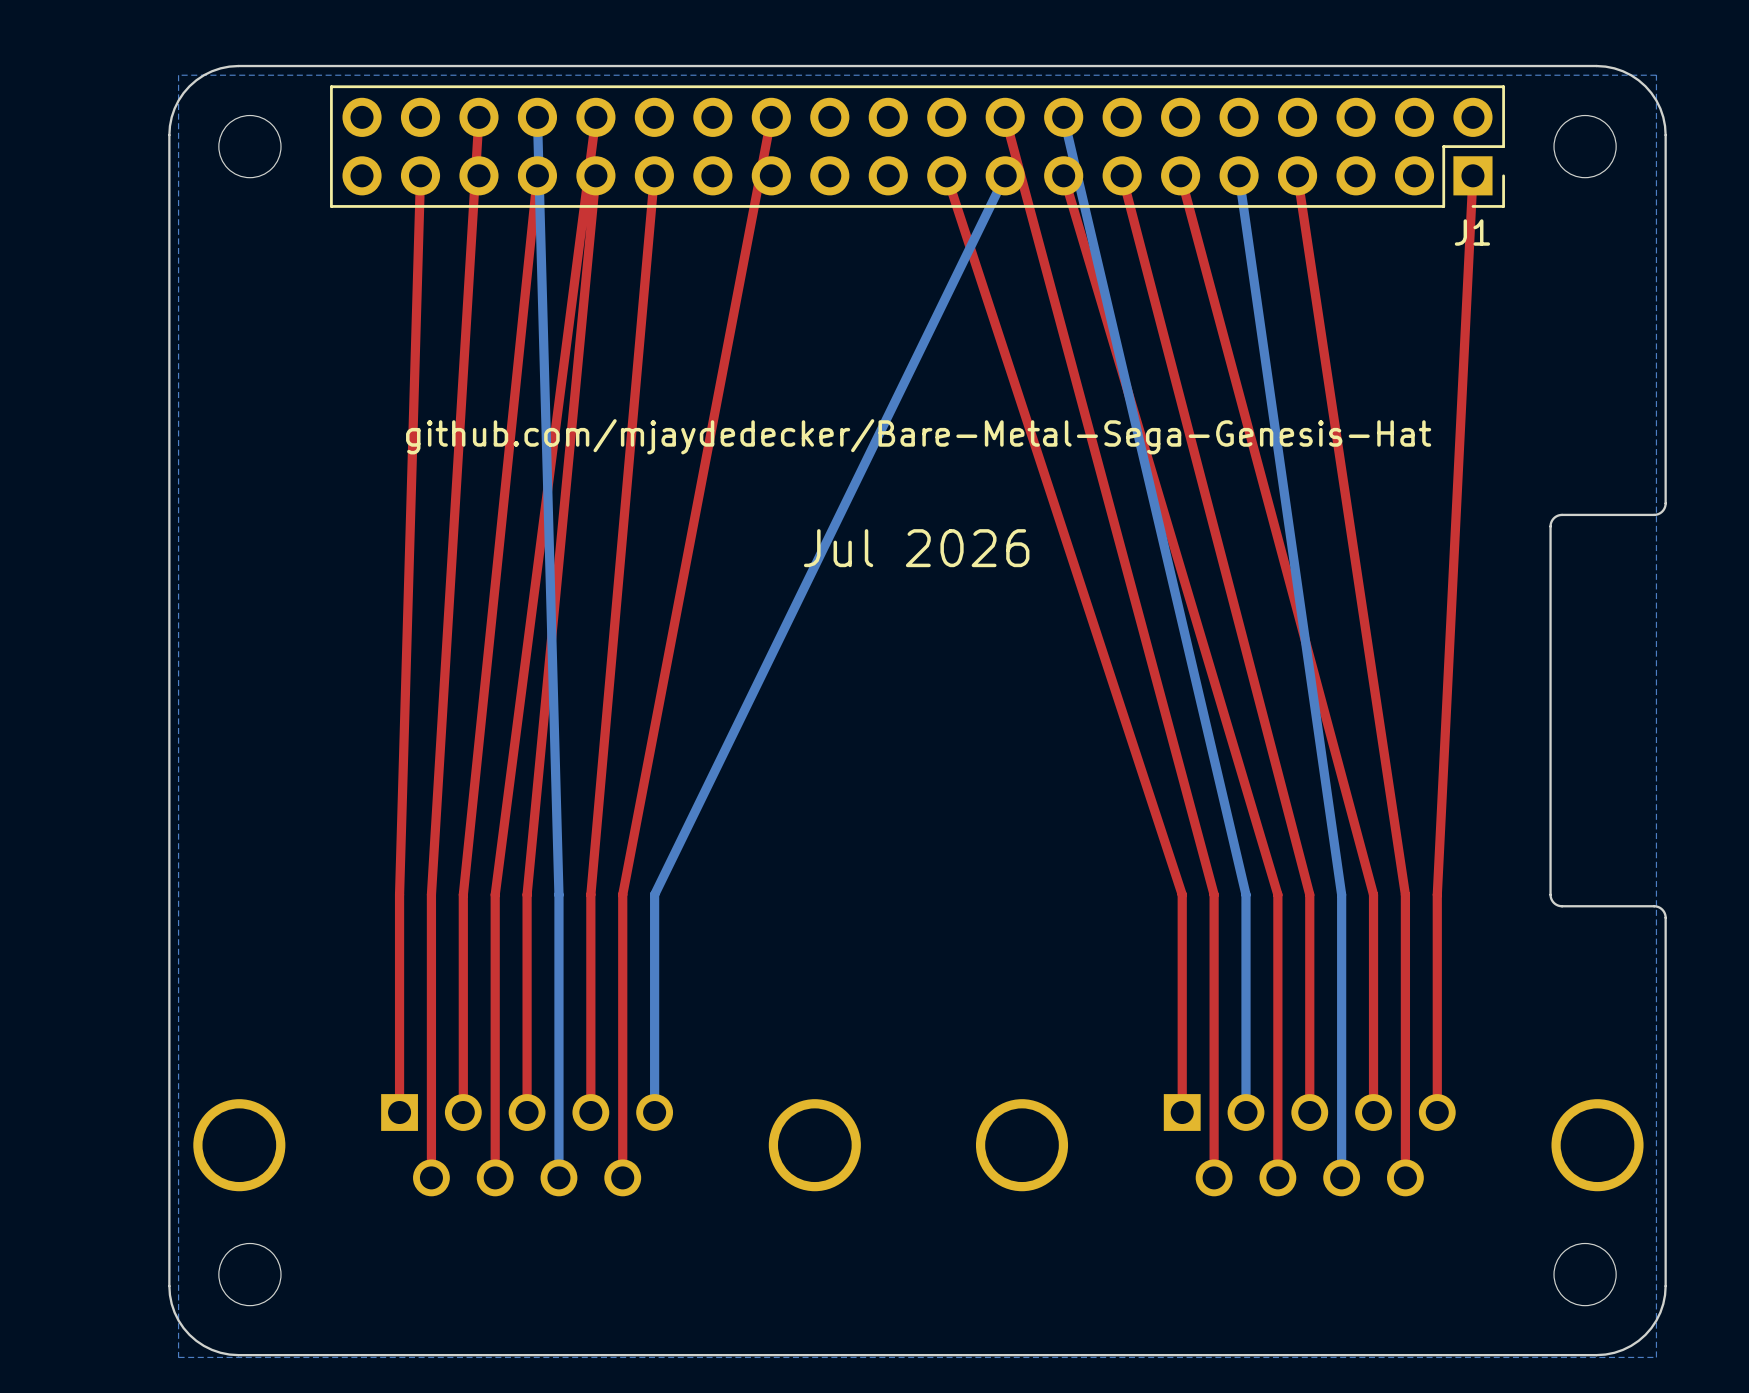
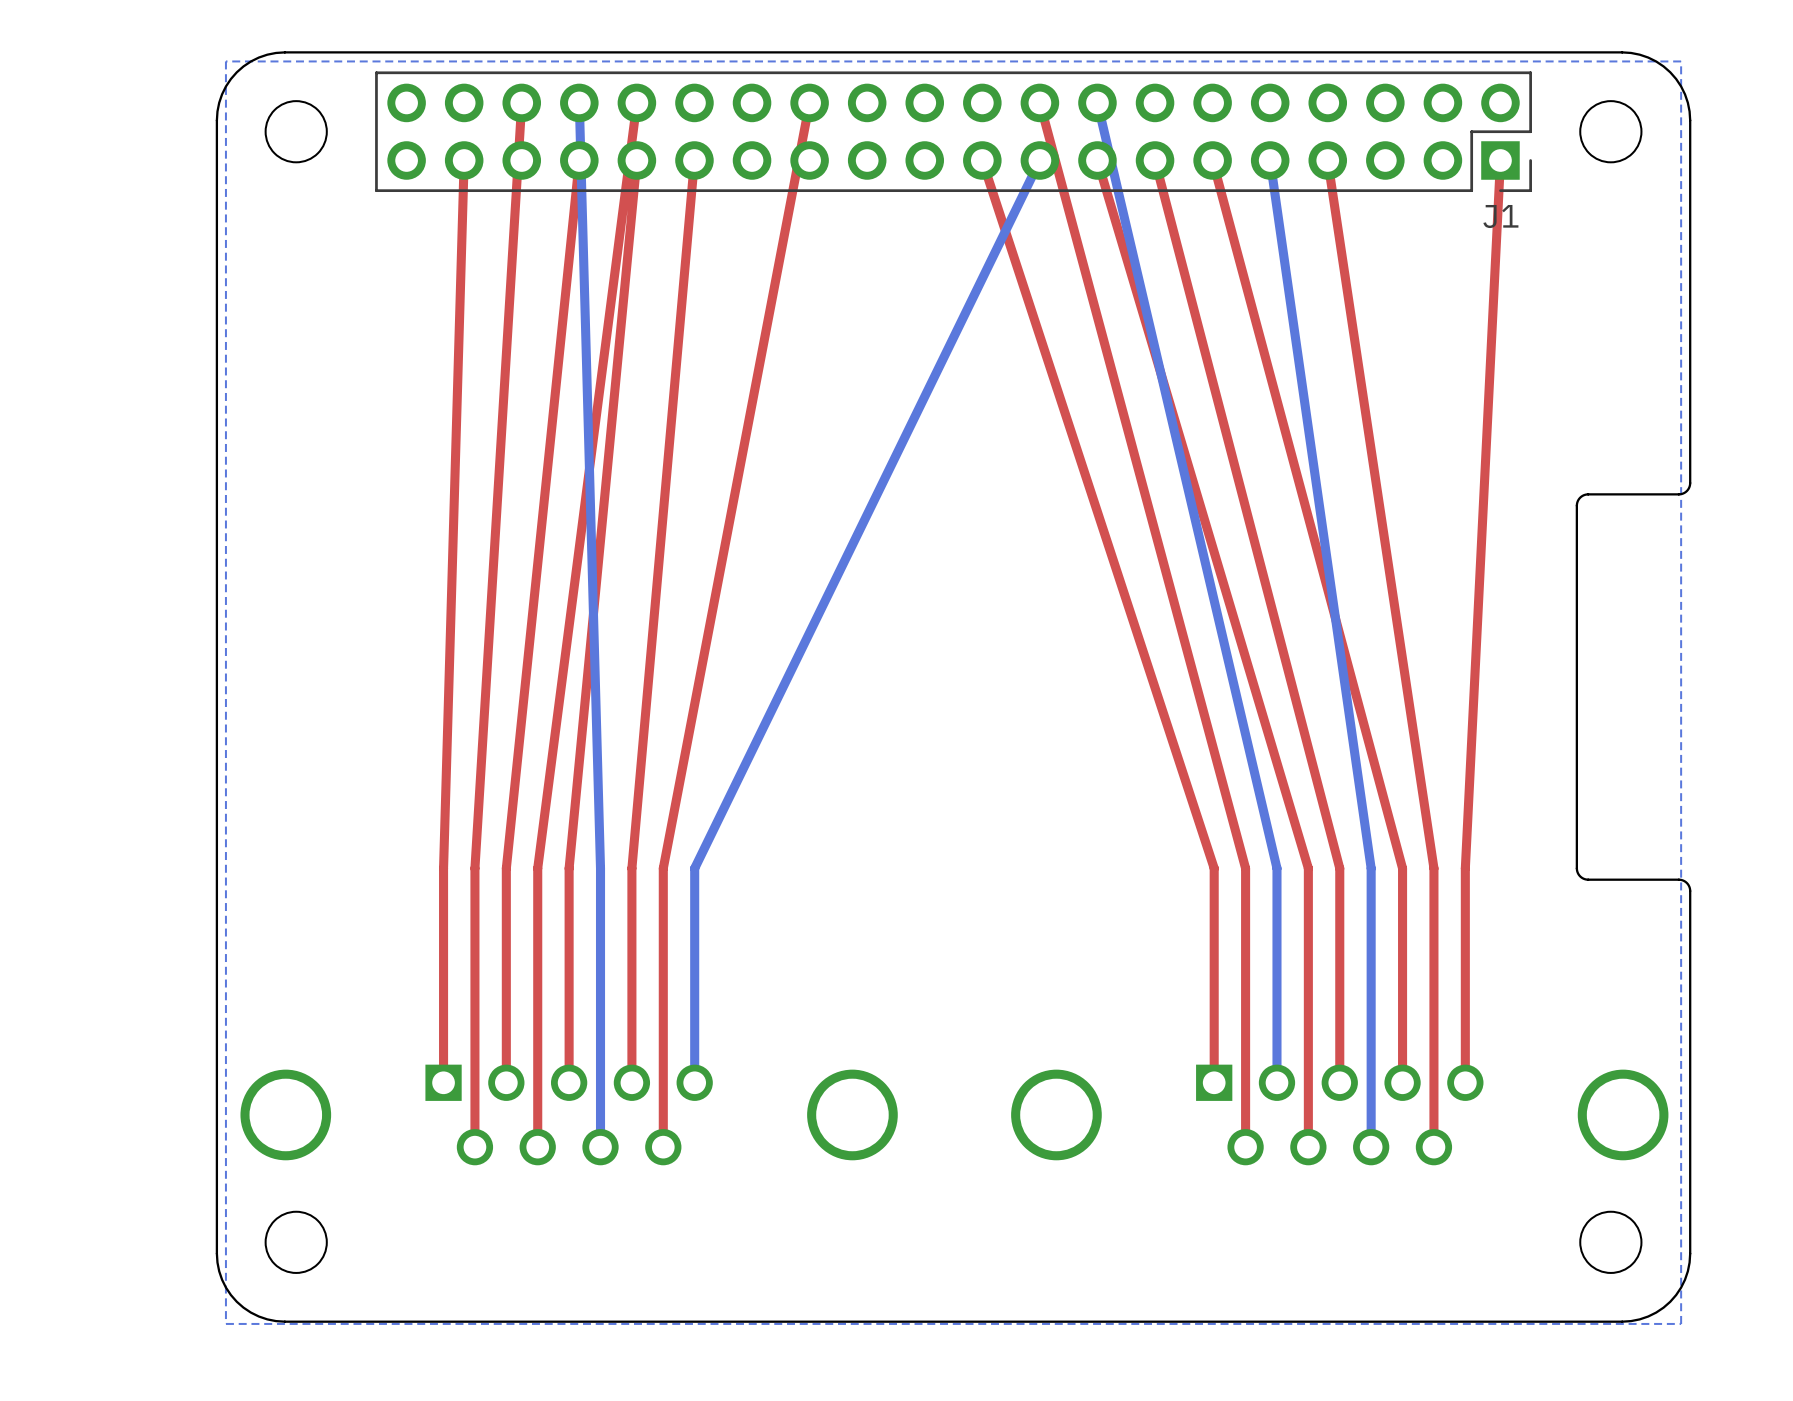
text: github.com/mjaydedecker/Bare-Metal-Sega-Genesis-Hat (918, 436) -> none
text: Jul 2026 (916, 548) -> none

